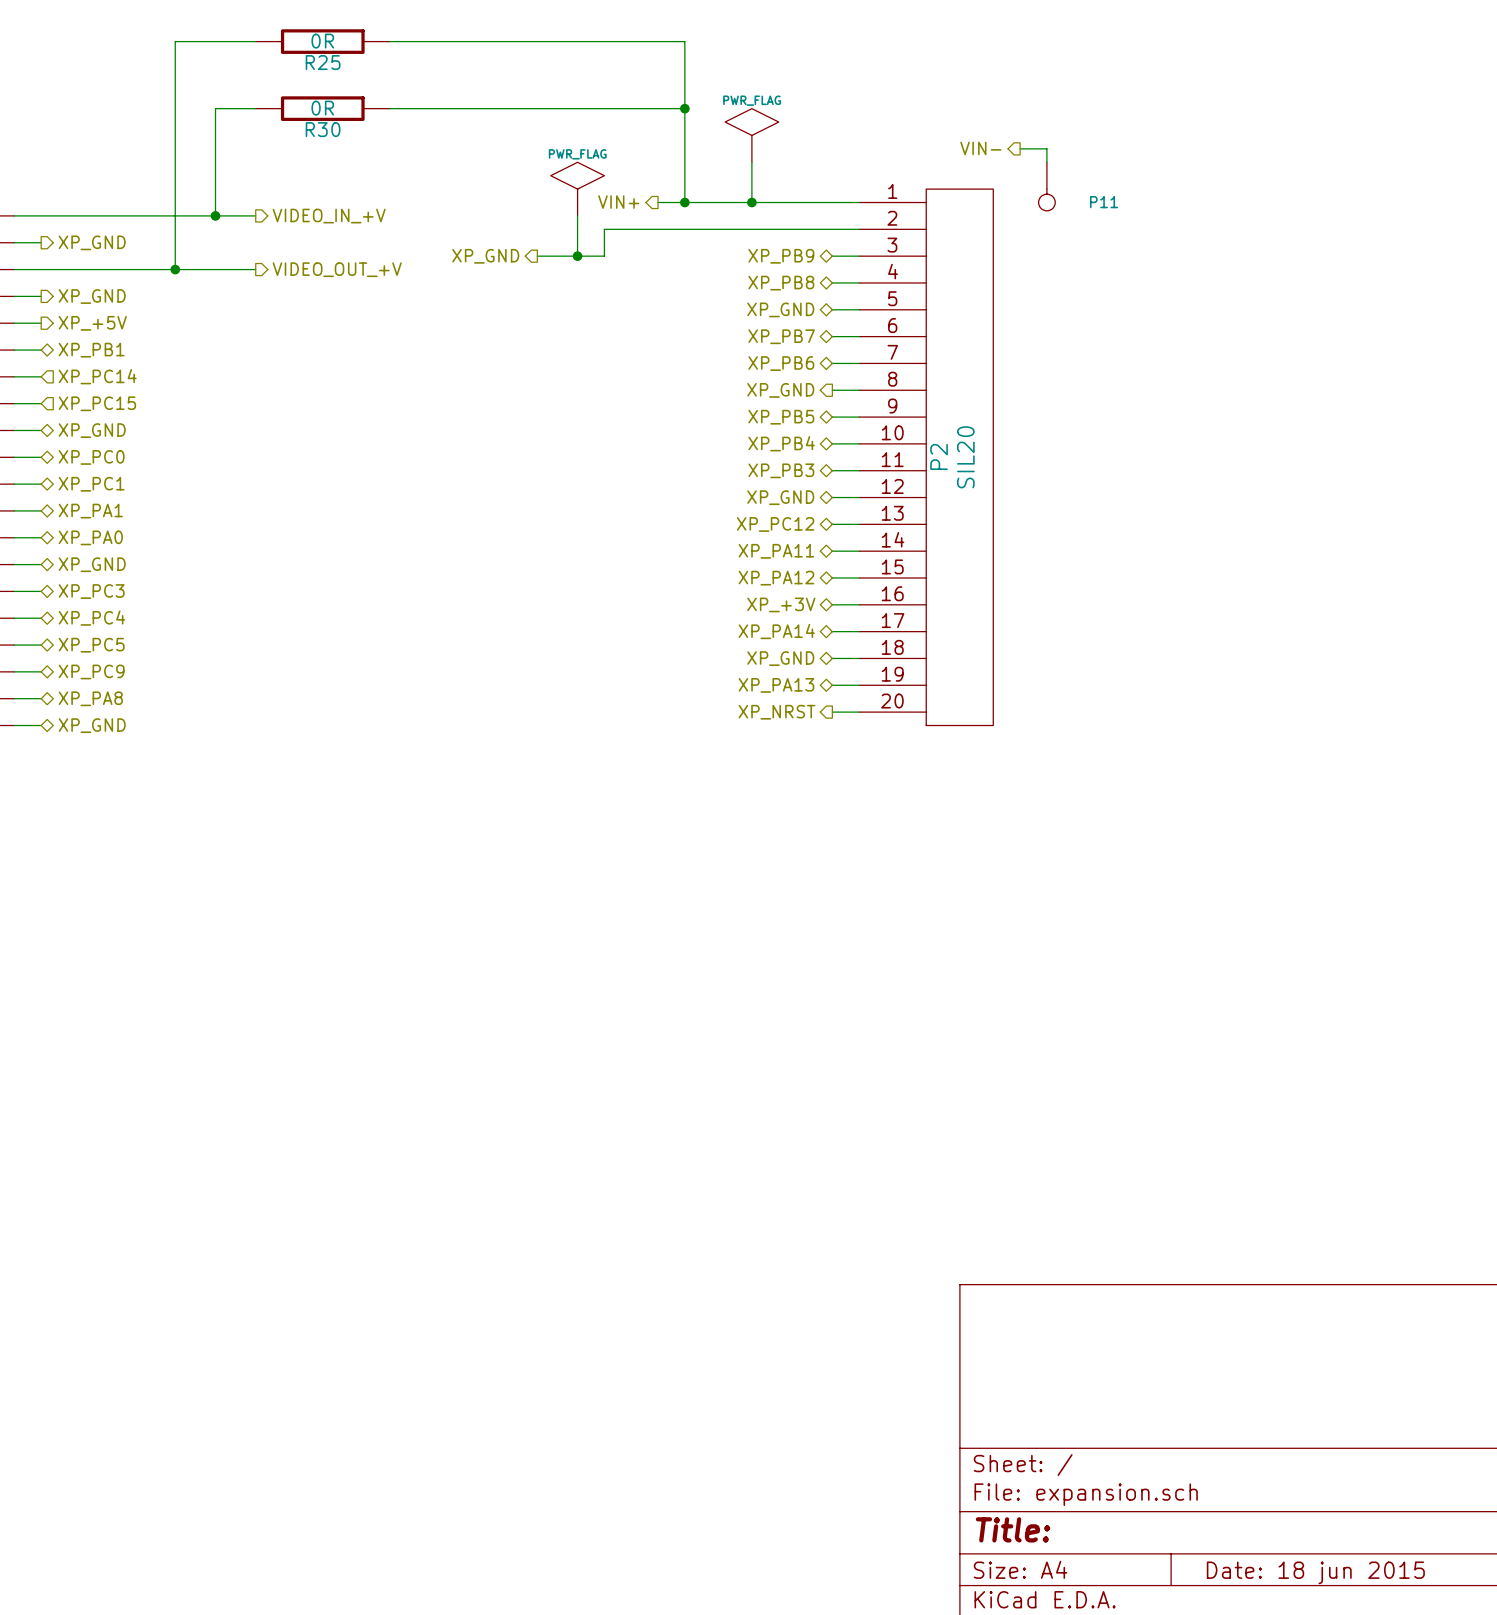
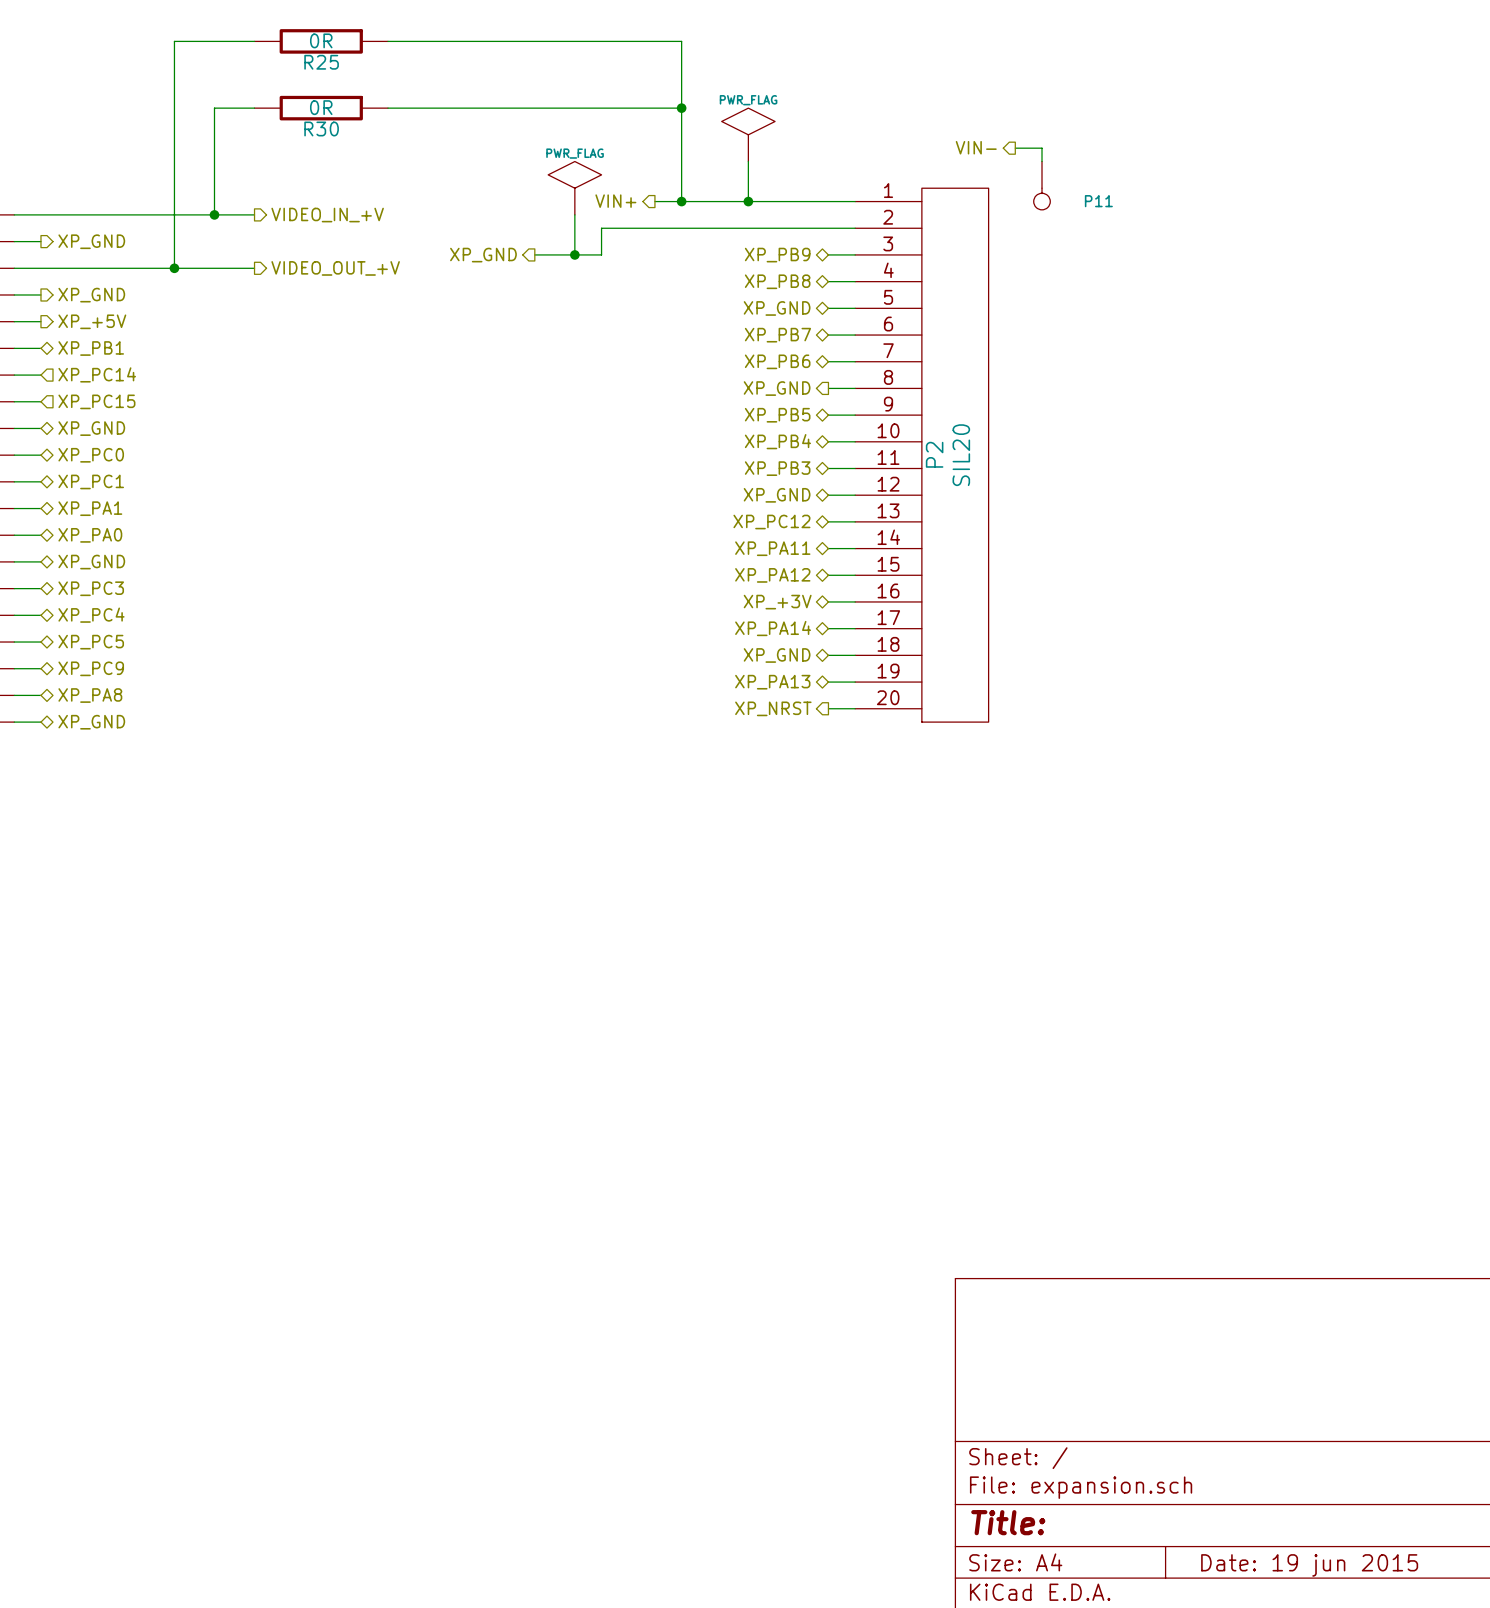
title block: Date: 18 jun 2015 (1315, 1572) -> Date: 19 jun 2015 (1309, 1565)

